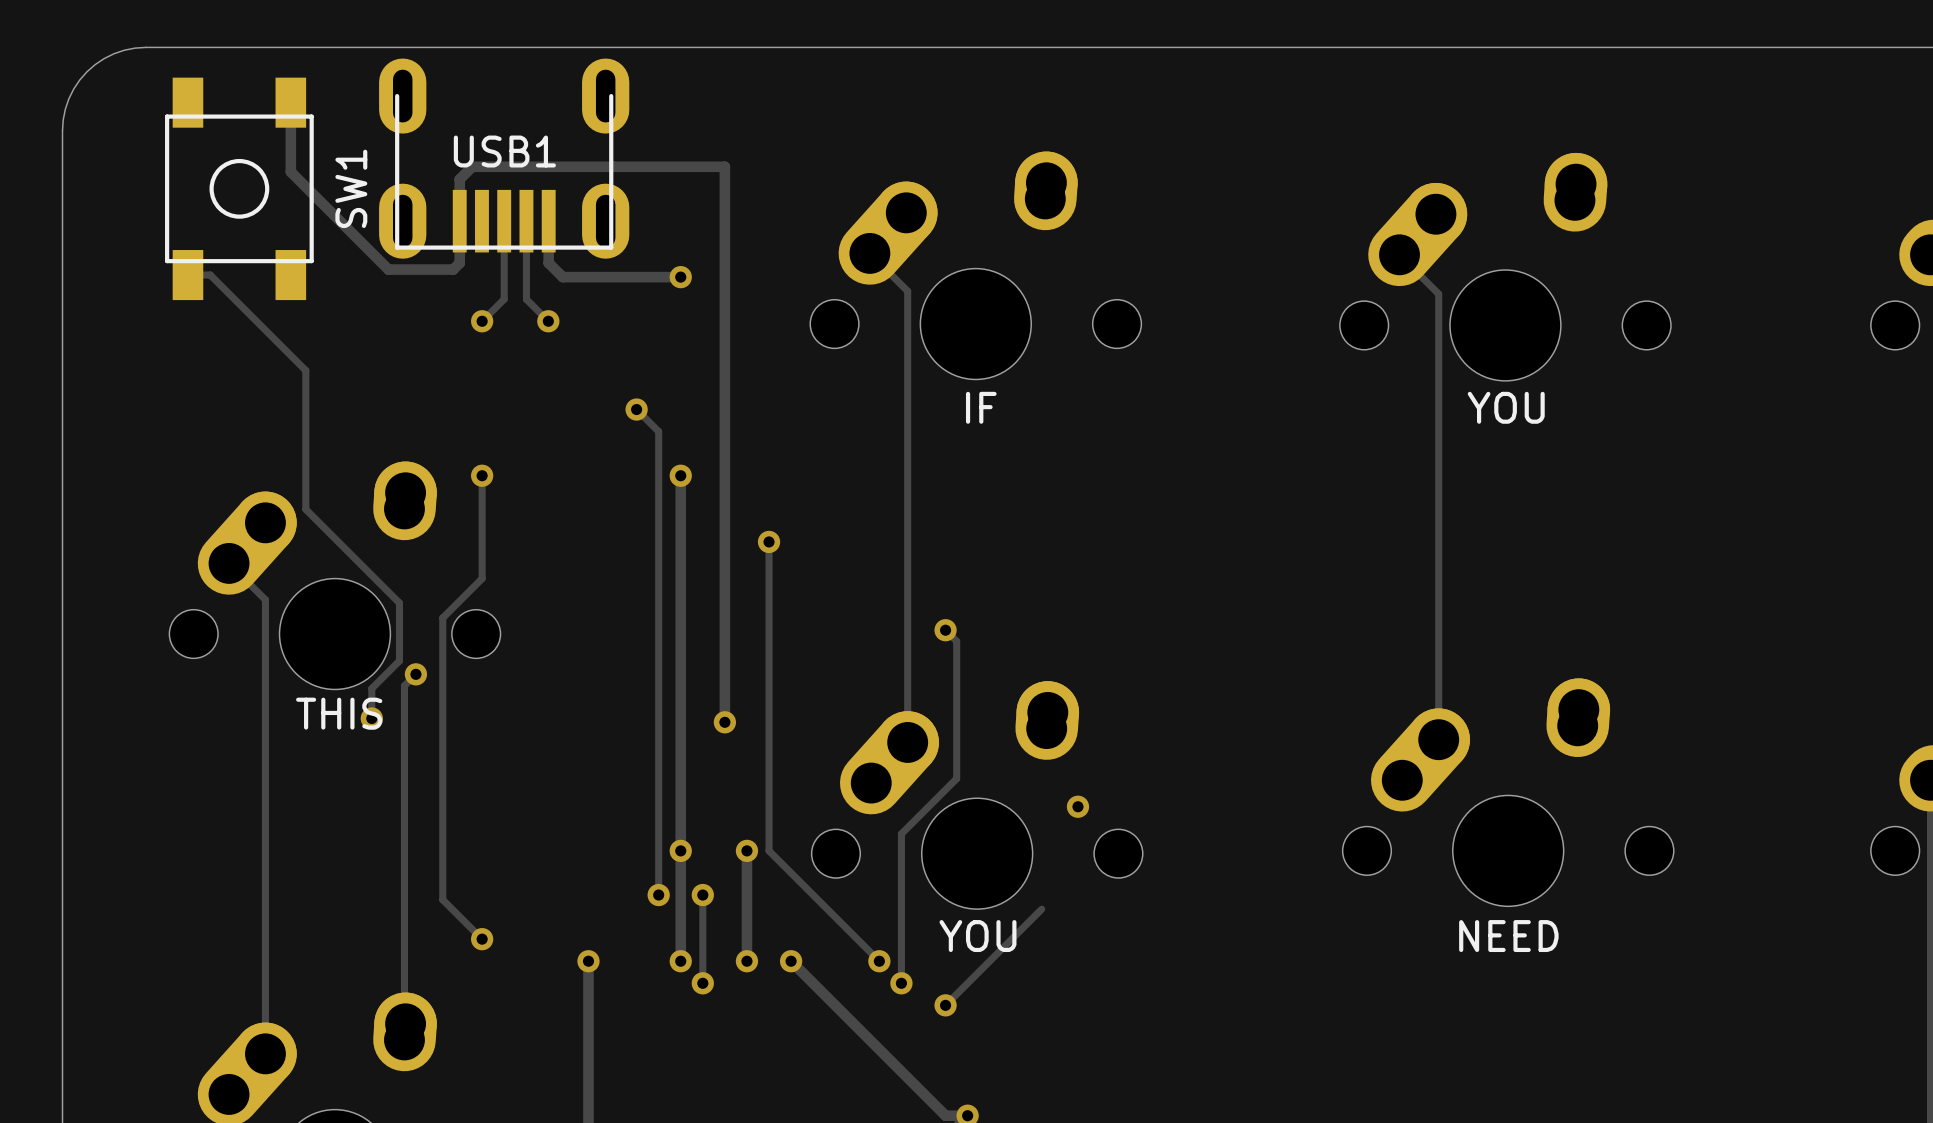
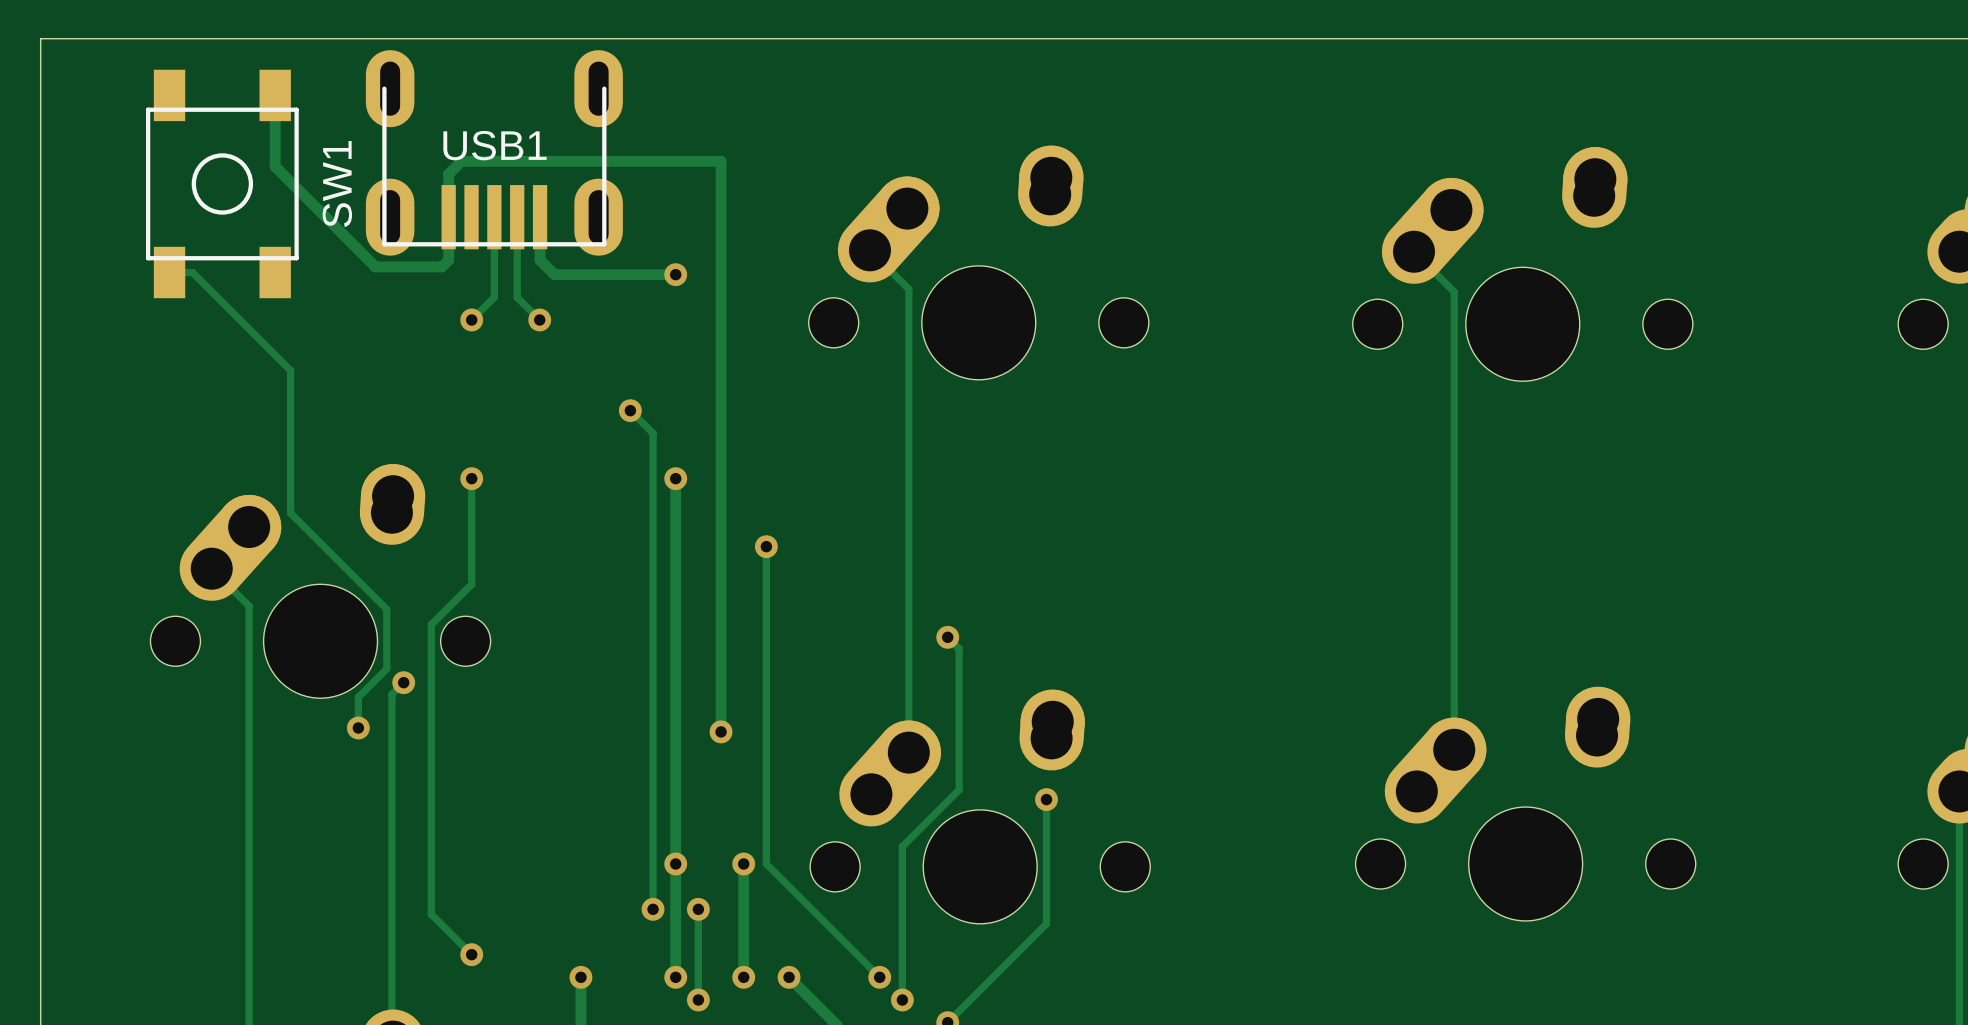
board edge: (145, 47) (113, 53) (86, 71) (68, 98) (62, 130) -> (126, 38) (40, 38) (40, 124)
text: IF (981, 407) -> none
text: YOU (1506, 407) -> none
text: THIS (339, 713) -> none
track: none -> (1046, 799) (1046, 923)
via position: (1077, 806) -> (1046, 799)
text: YOU (977, 936) -> none
text: NEED (1508, 936) -> none

